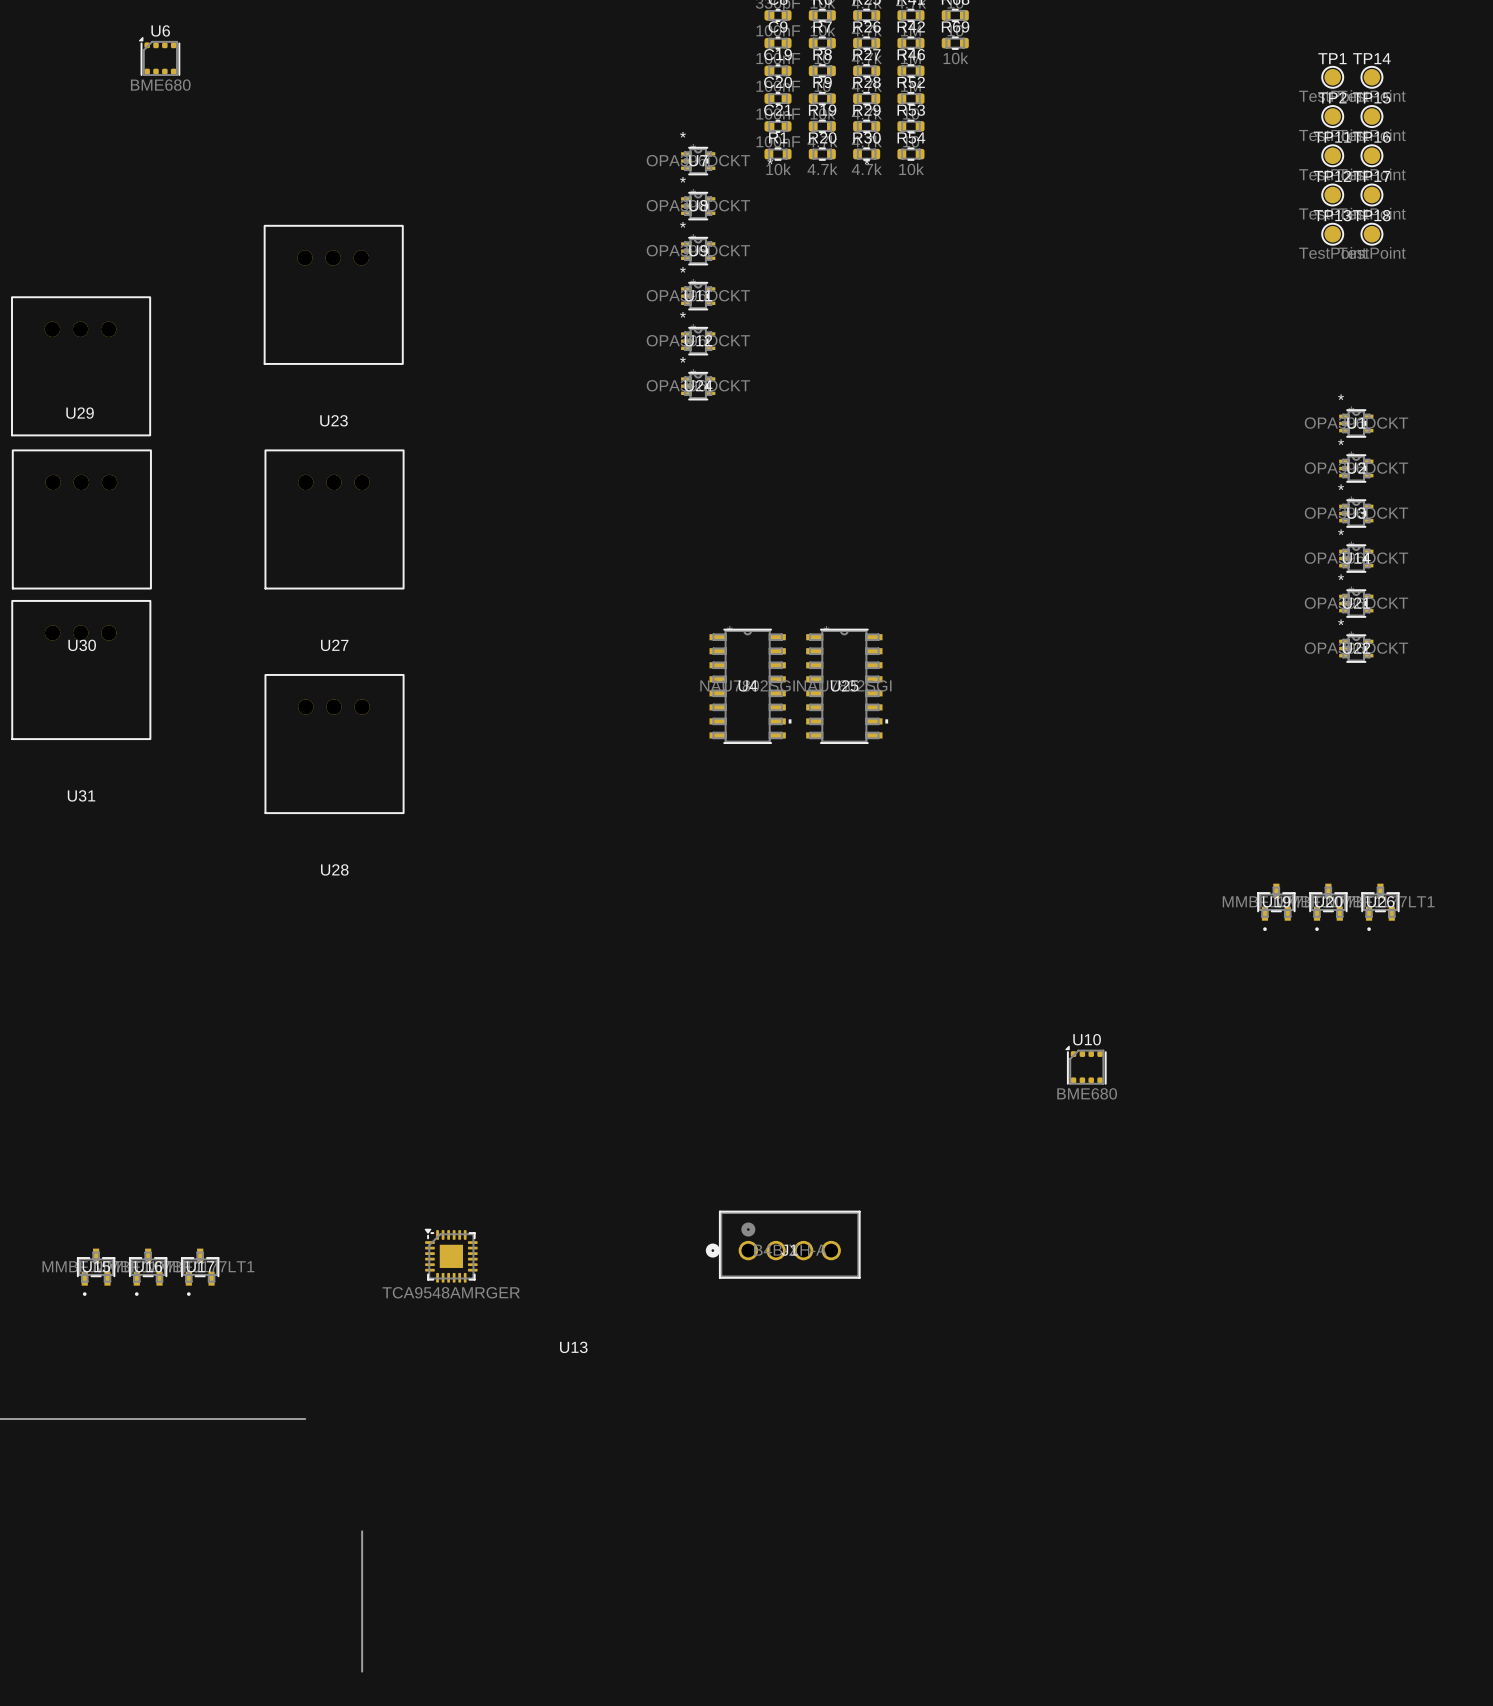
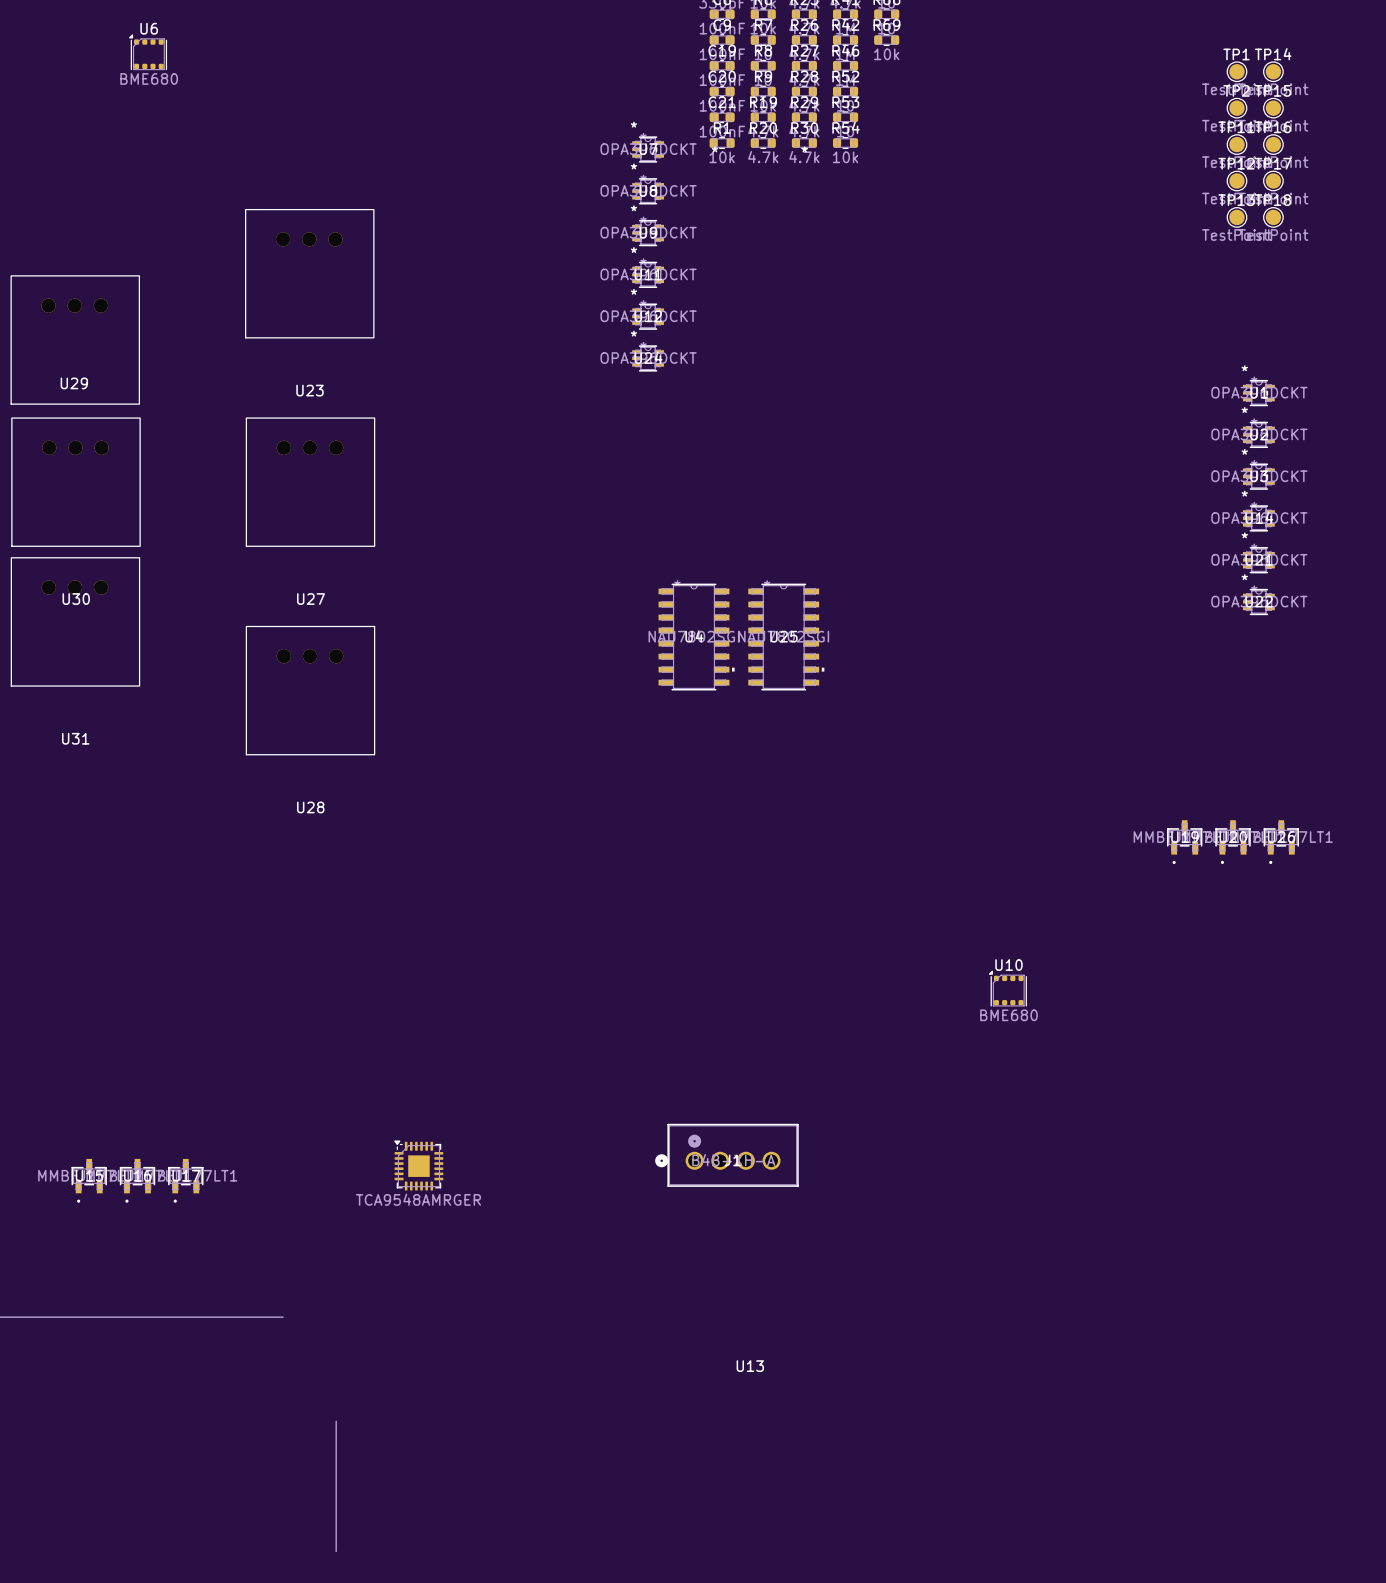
U13 name position: U13 (573, 1347) -> U13 (750, 1366)

